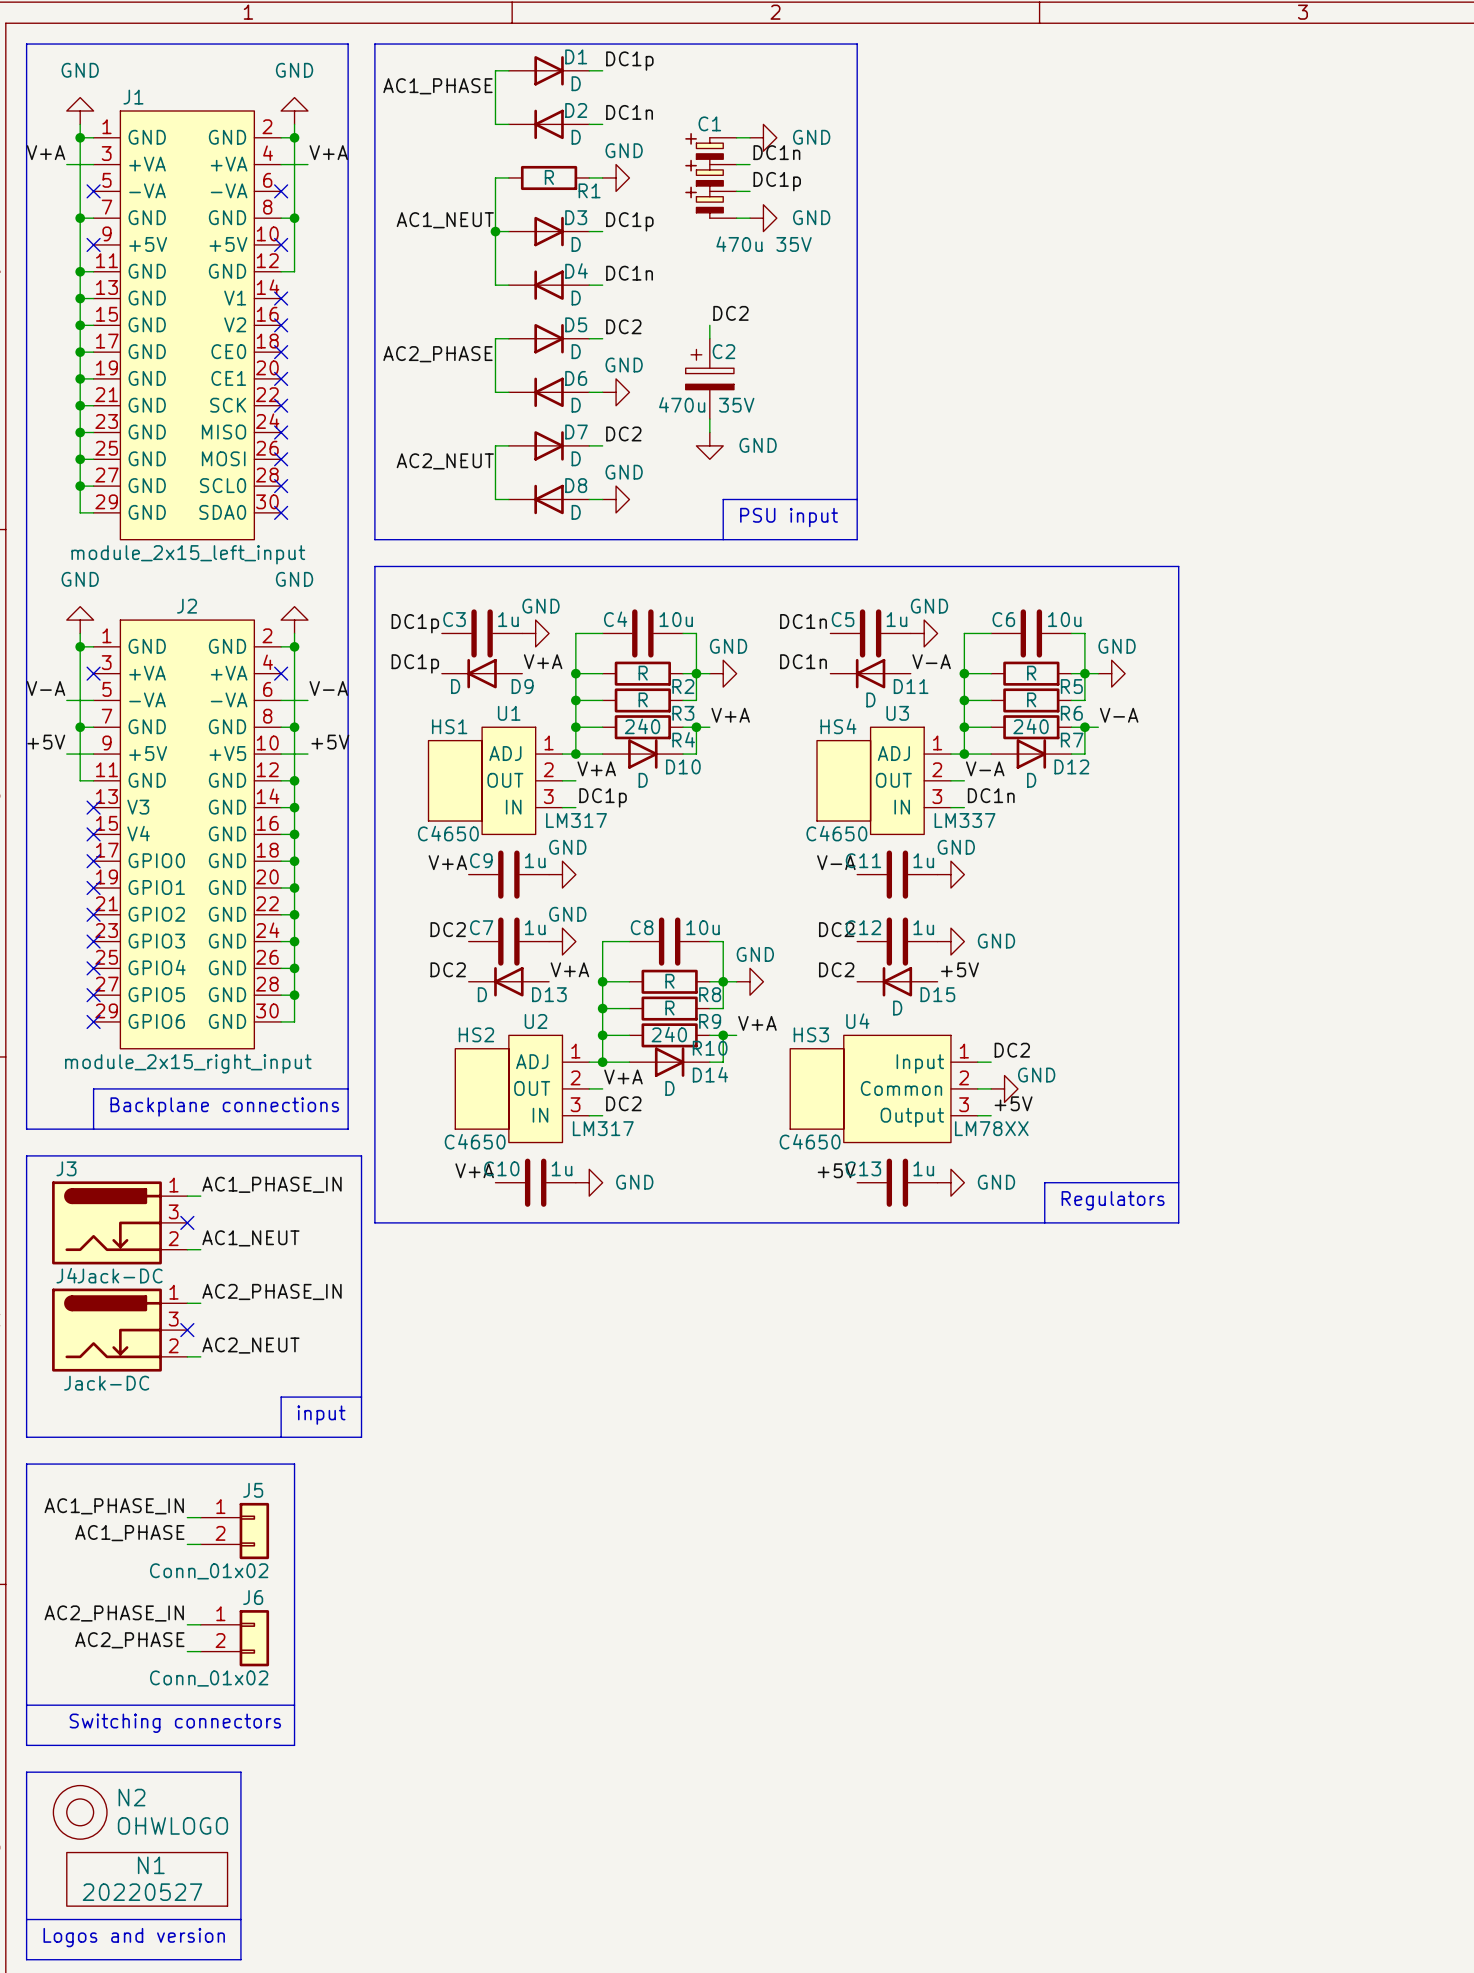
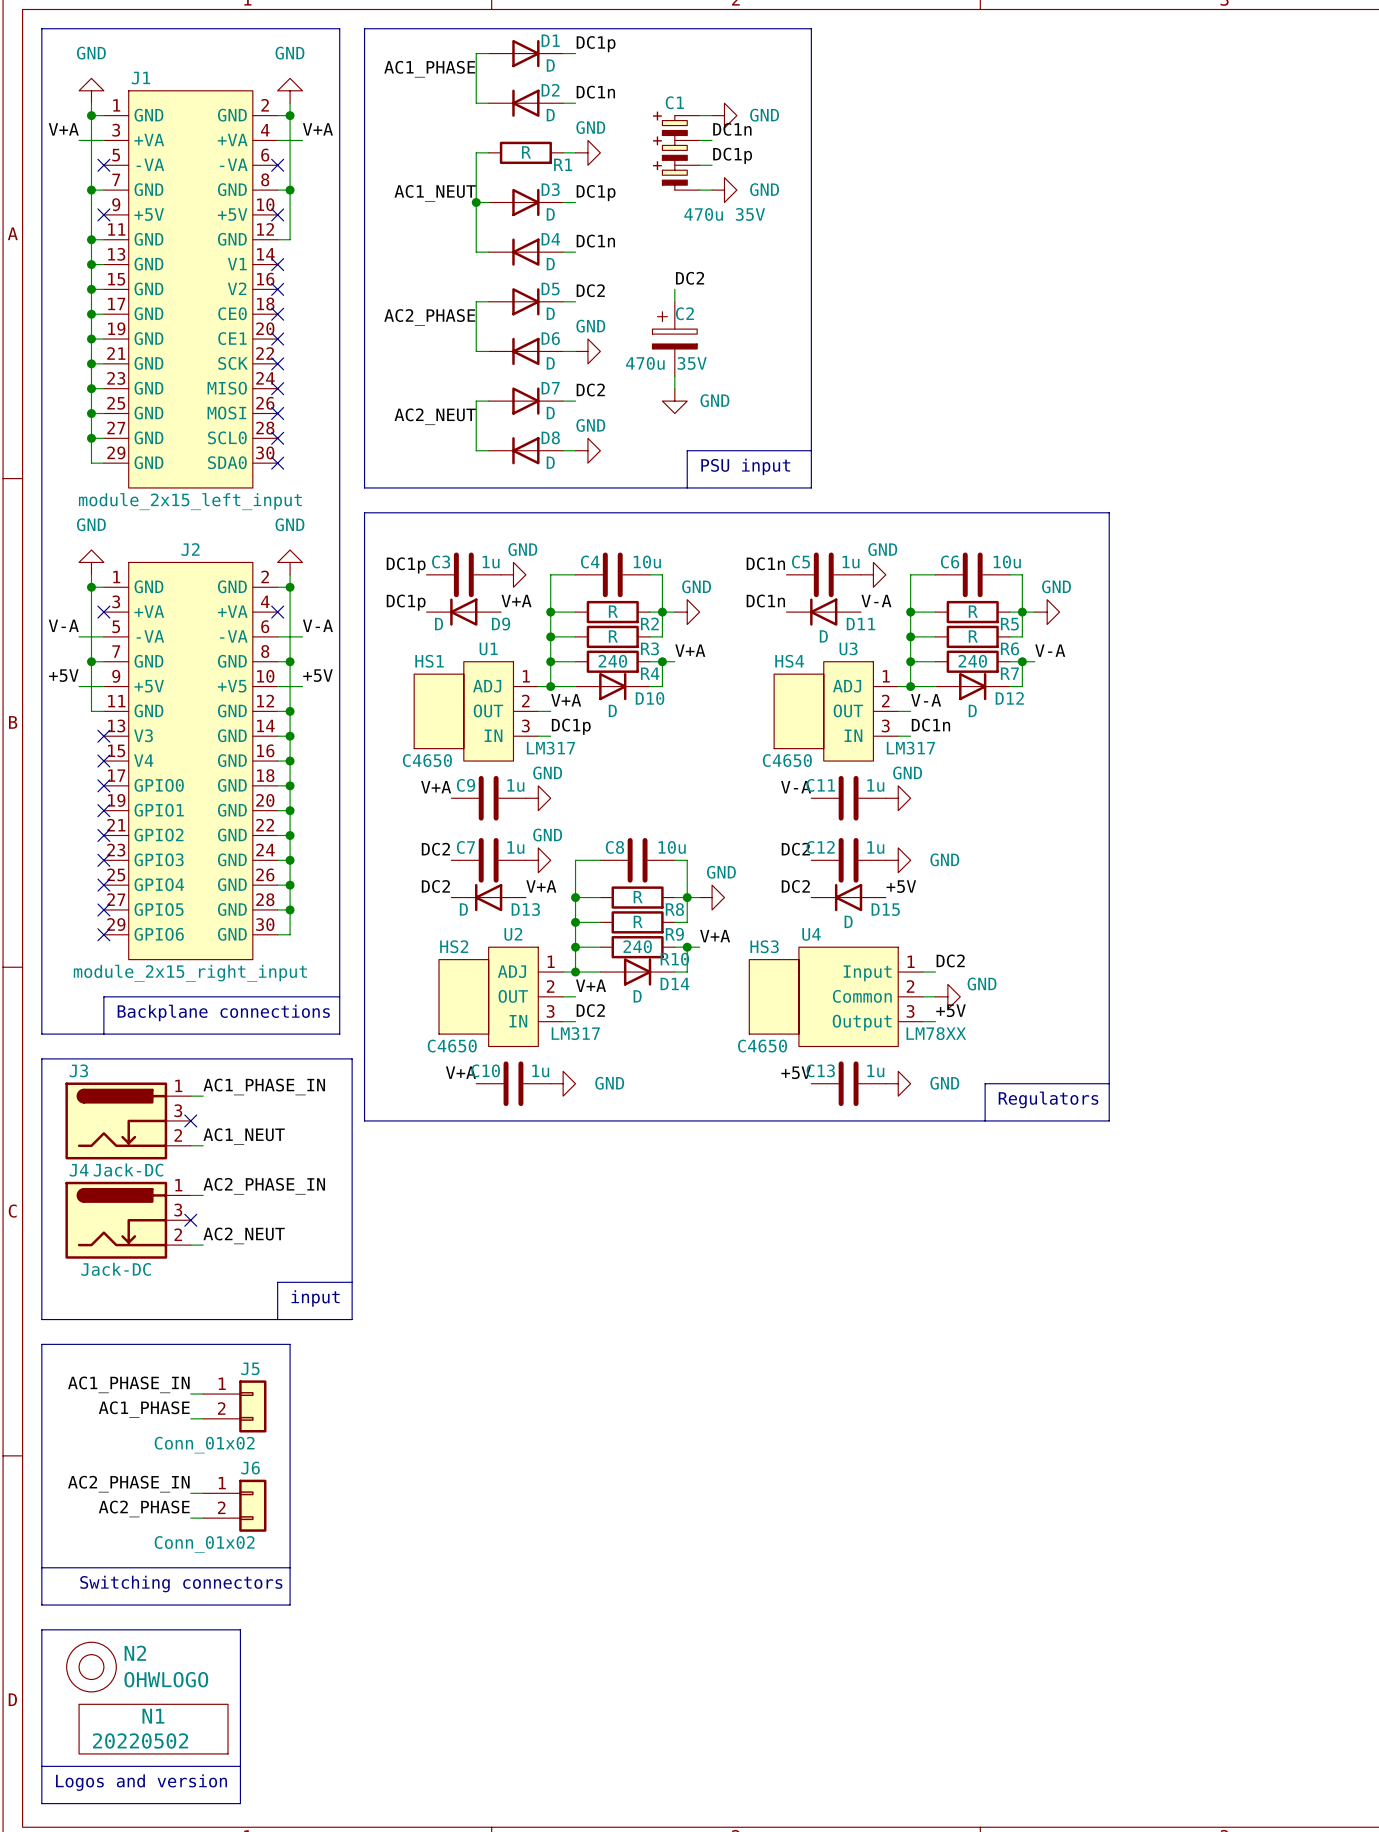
U3 value: LM337 (965, 820) -> LM317 (910, 748)
N1 value: 20220527 (142, 1892) -> 20220502 (140, 1741)

